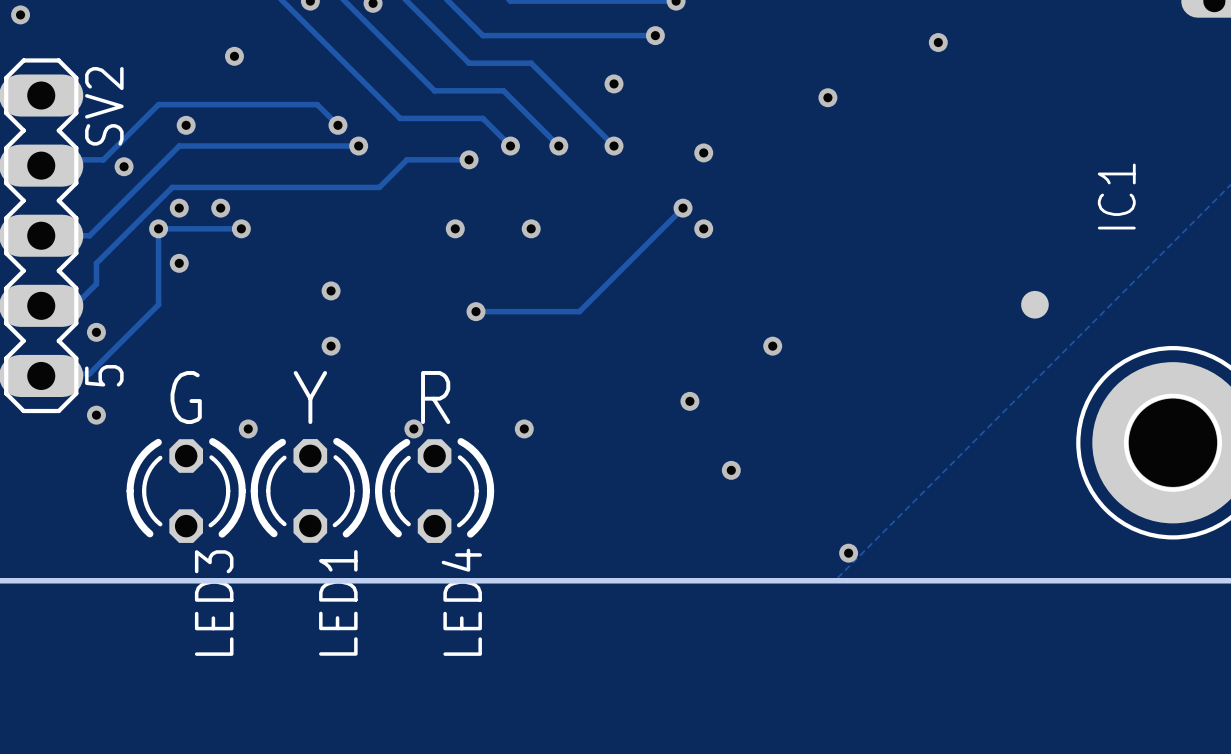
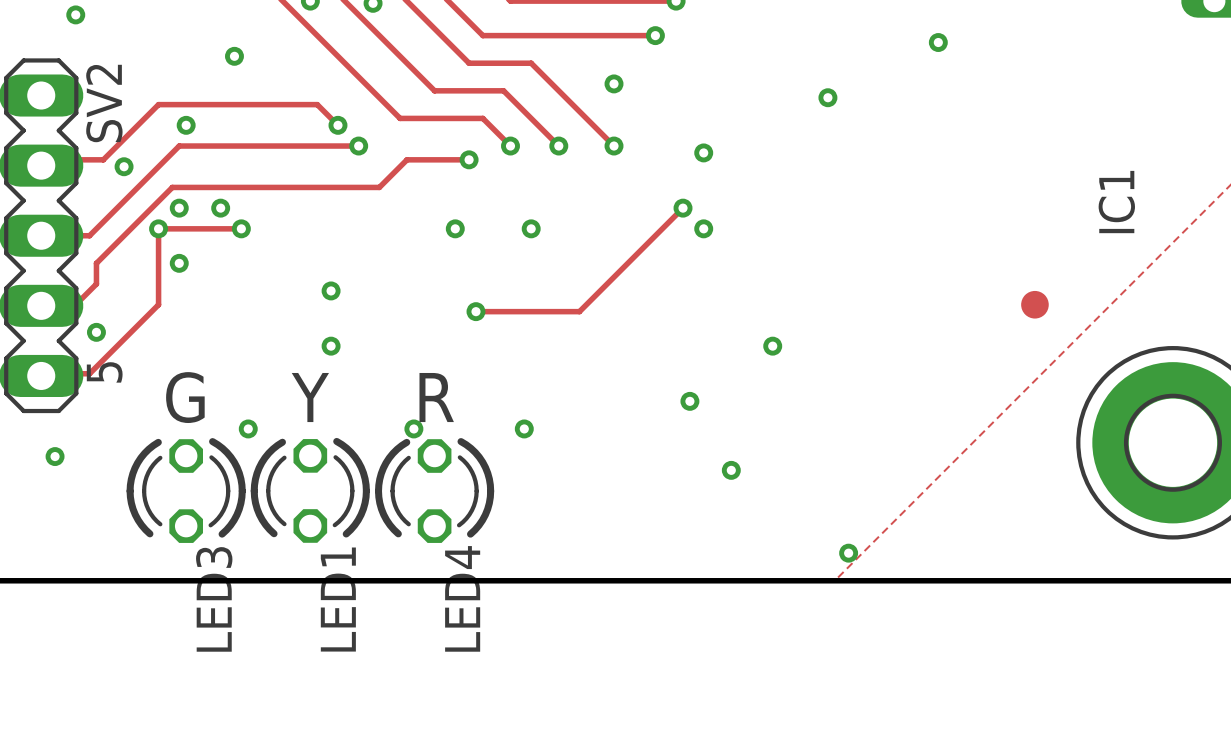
via: (20, 14) -> none
via: none -> (75, 14)
via position: (96, 415) -> (55, 456)

